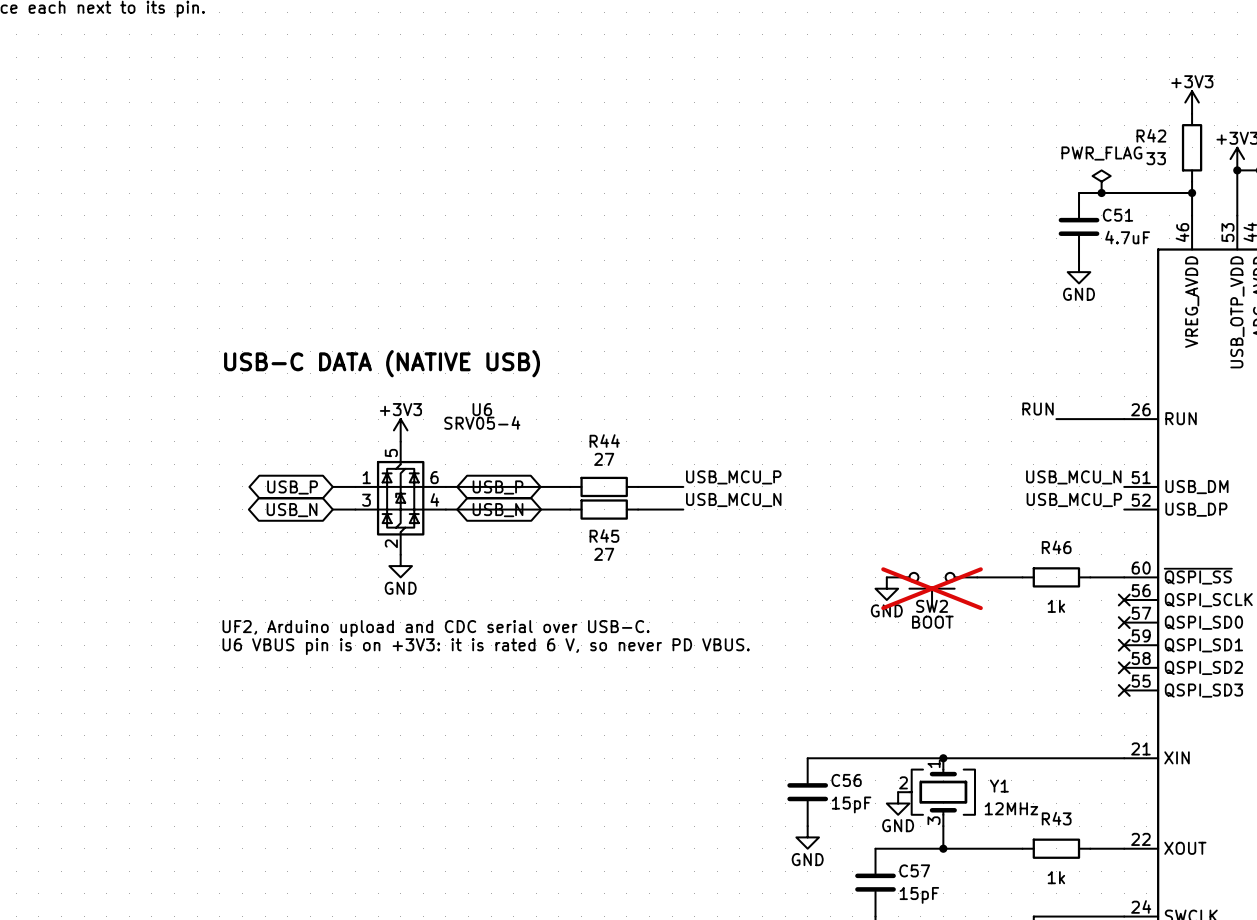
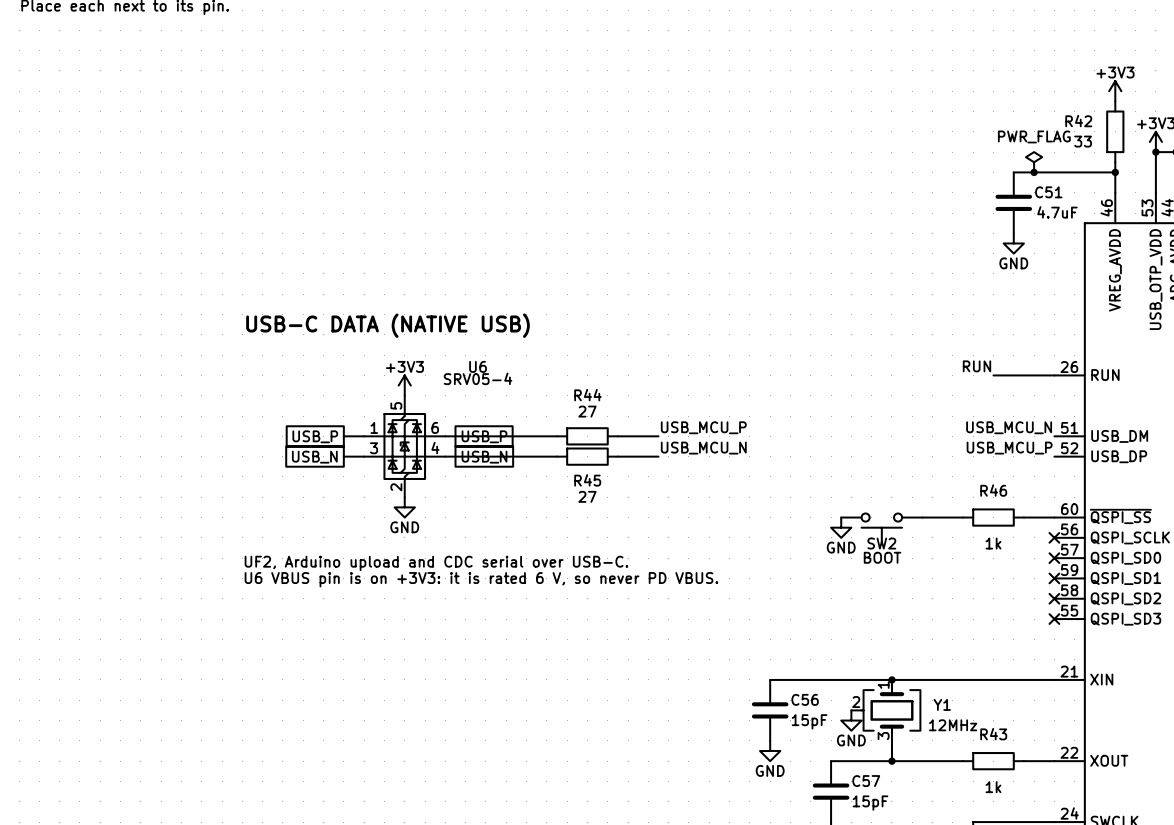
global label shape: bidirectional (292, 487) -> passive (315, 436)
global label shape: bidirectional (498, 487) -> passive (484, 436)
global label shape: bidirectional (292, 510) -> passive (314, 457)
global label shape: bidirectional (498, 510) -> passive (484, 457)
SW2 do-not-place cross: (932, 588) -> none

